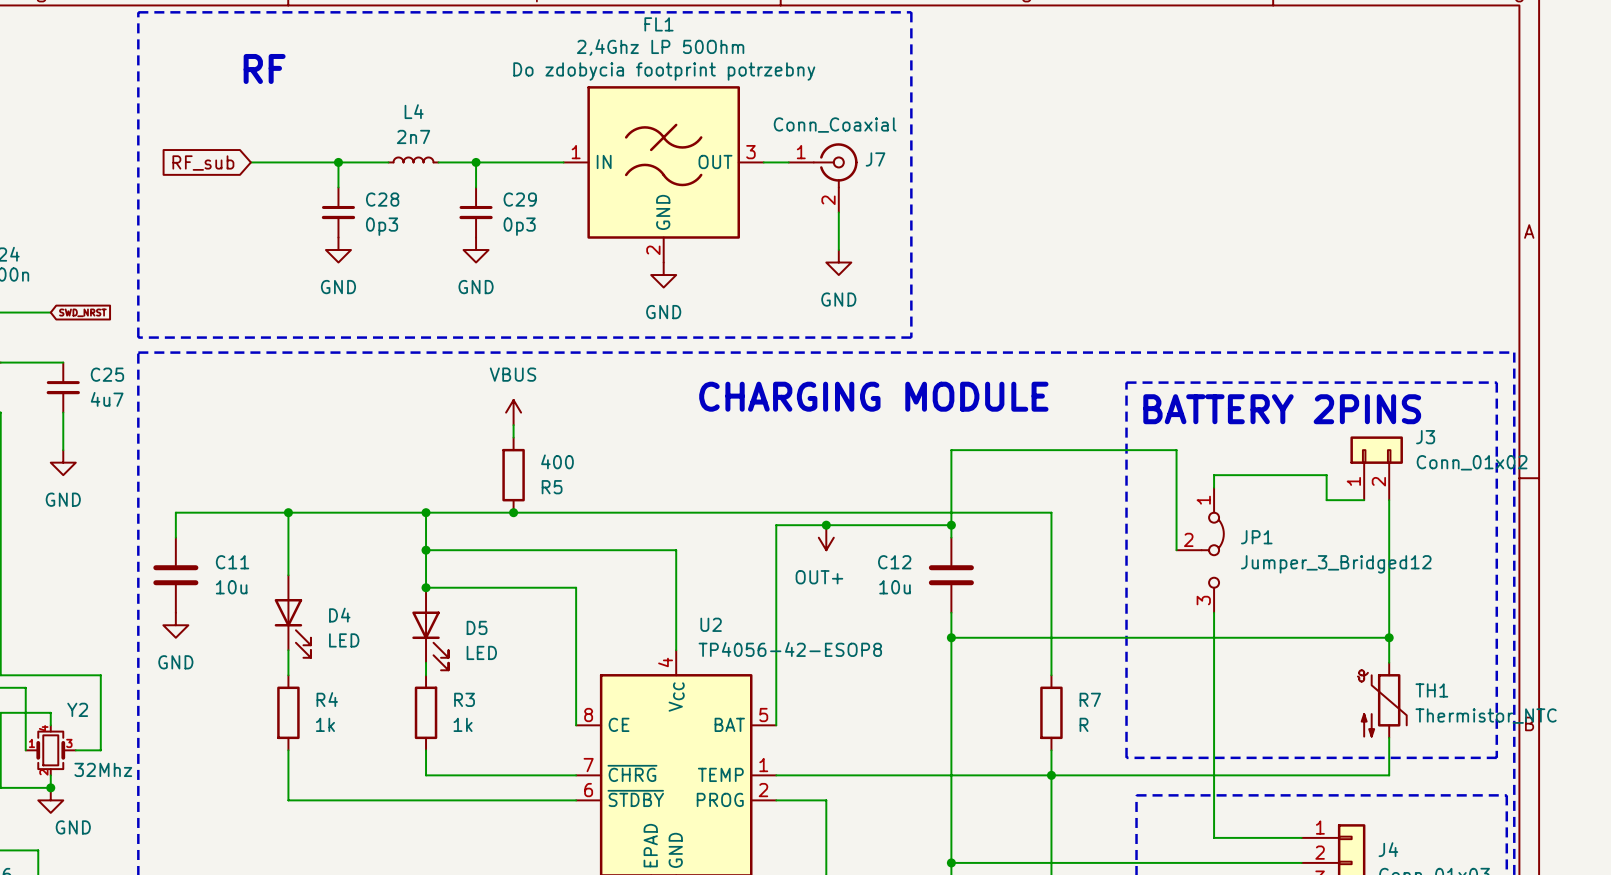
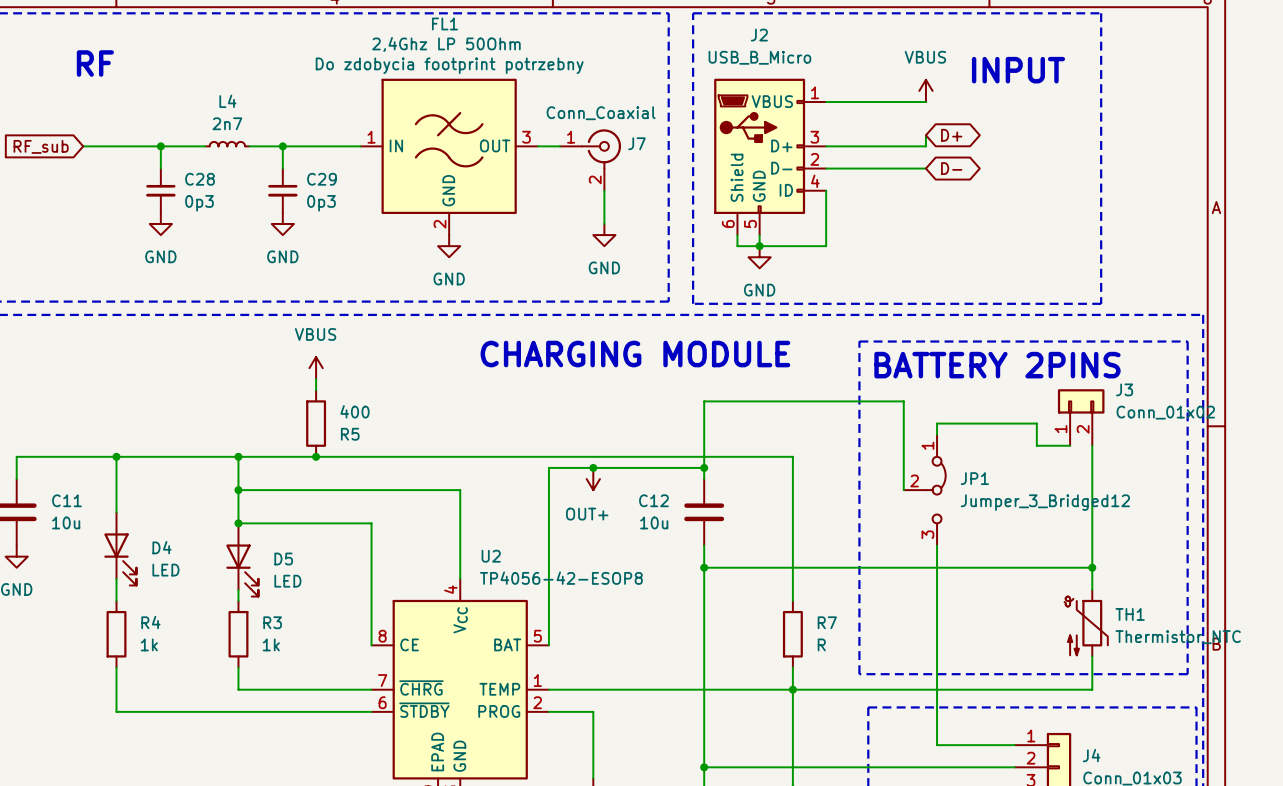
line: none -> (693, 13) (1101, 13) (1101, 303) (693, 303) (693, 13)
text: none -> INPUT (1018, 70)
power symbol: none -> VBUS (925, 90)
wire: none -> (826, 102) (925, 102)
wire: none -> (925, 135) (925, 146) (826, 146)
global label: none -> D+ (951, 135)
J2: none -> USB_B_Micro (770, 156)
wire: none -> (826, 168) (925, 168)
global label: none -> D- (951, 168)
wire: none -> (826, 190) (826, 246) (737, 246) (737, 235)
wire: none -> (759, 235) (759, 246)
junction: none -> (759, 246)
power symbol: none -> GND (759, 257)

